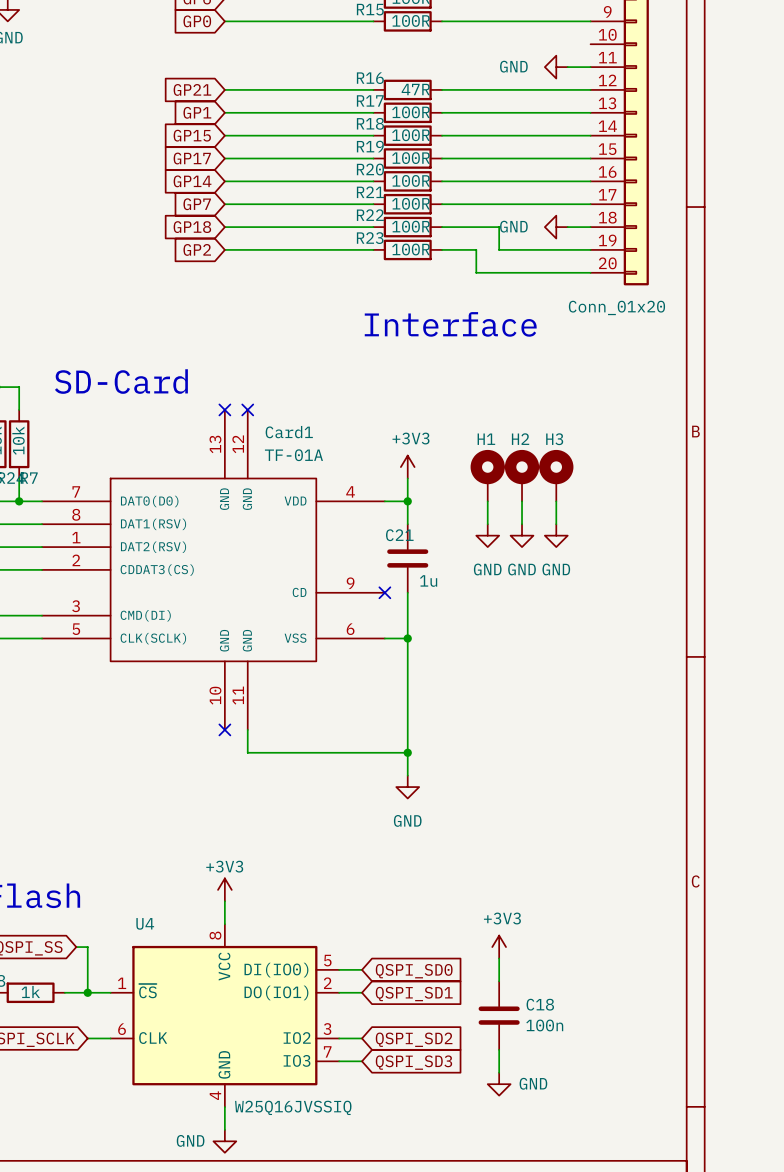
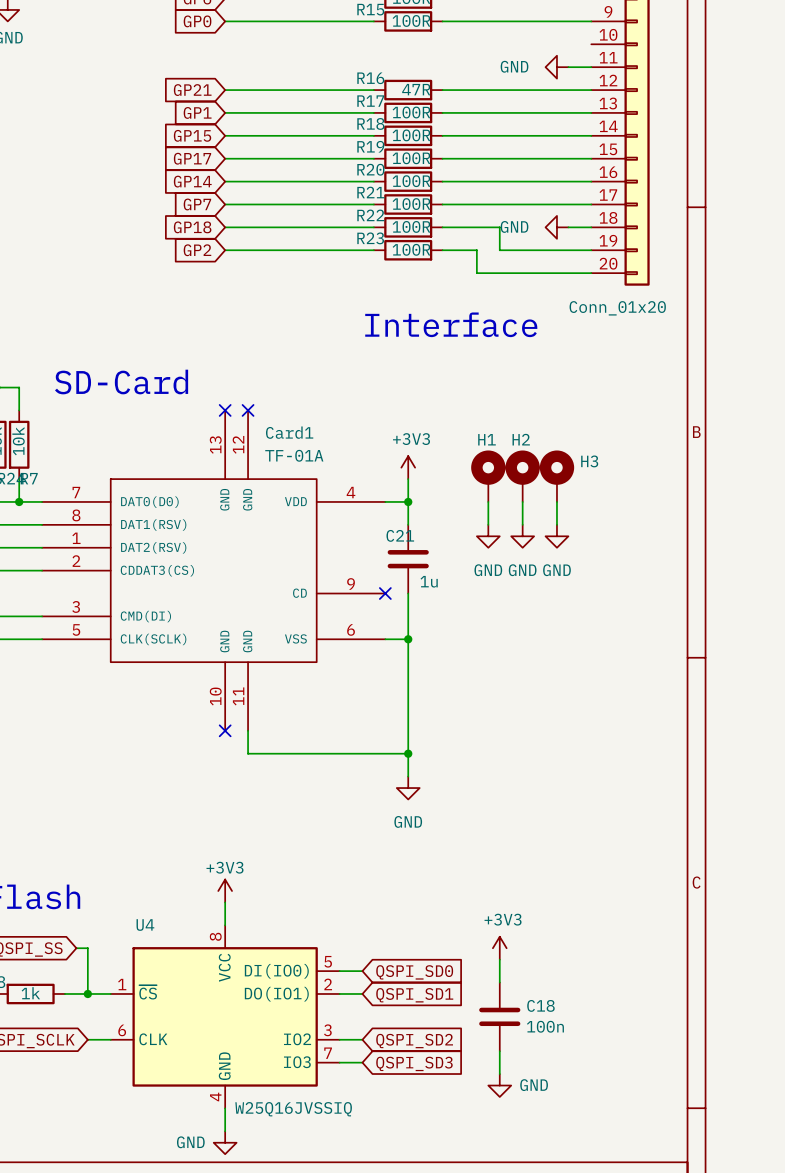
H3 name position: H3 (554, 439) -> H3 (589, 461)

